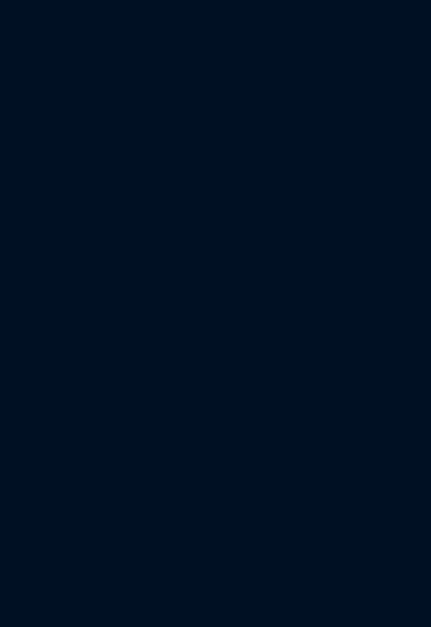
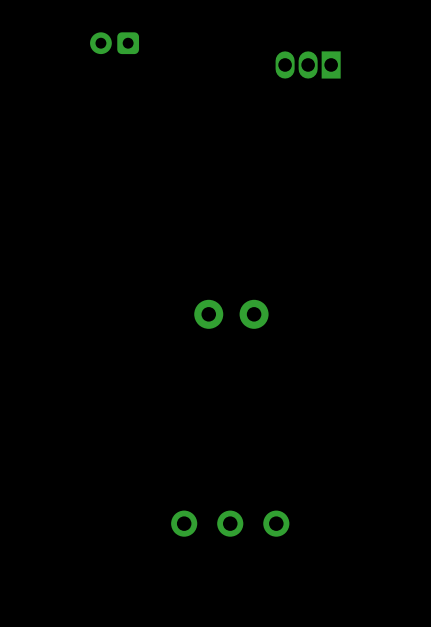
part: none -> (114, 43)
part: none -> (308, 64)
part: none -> (231, 314)
part: none -> (230, 523)

